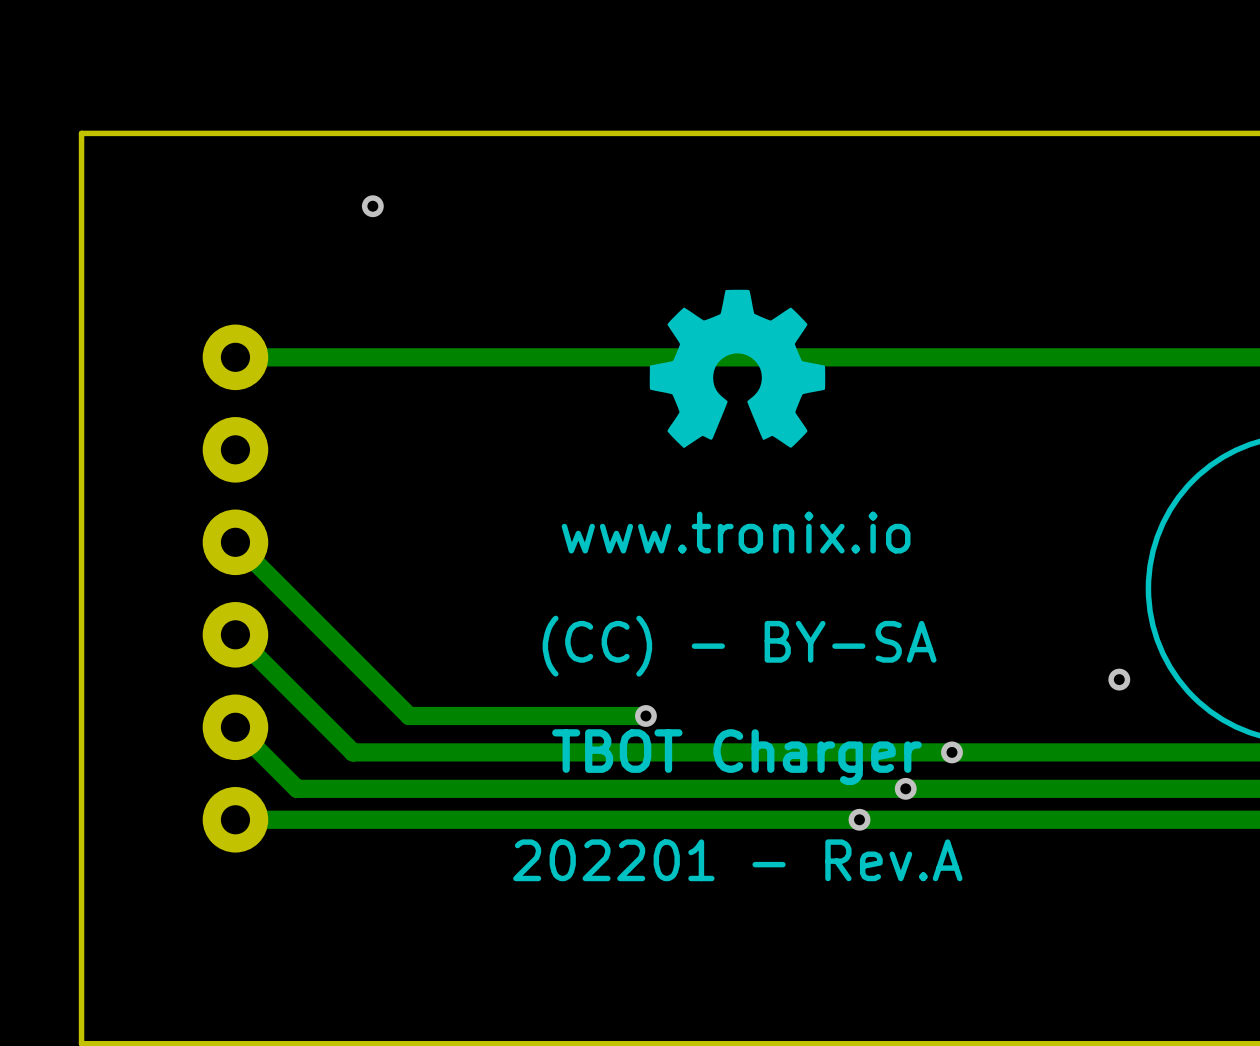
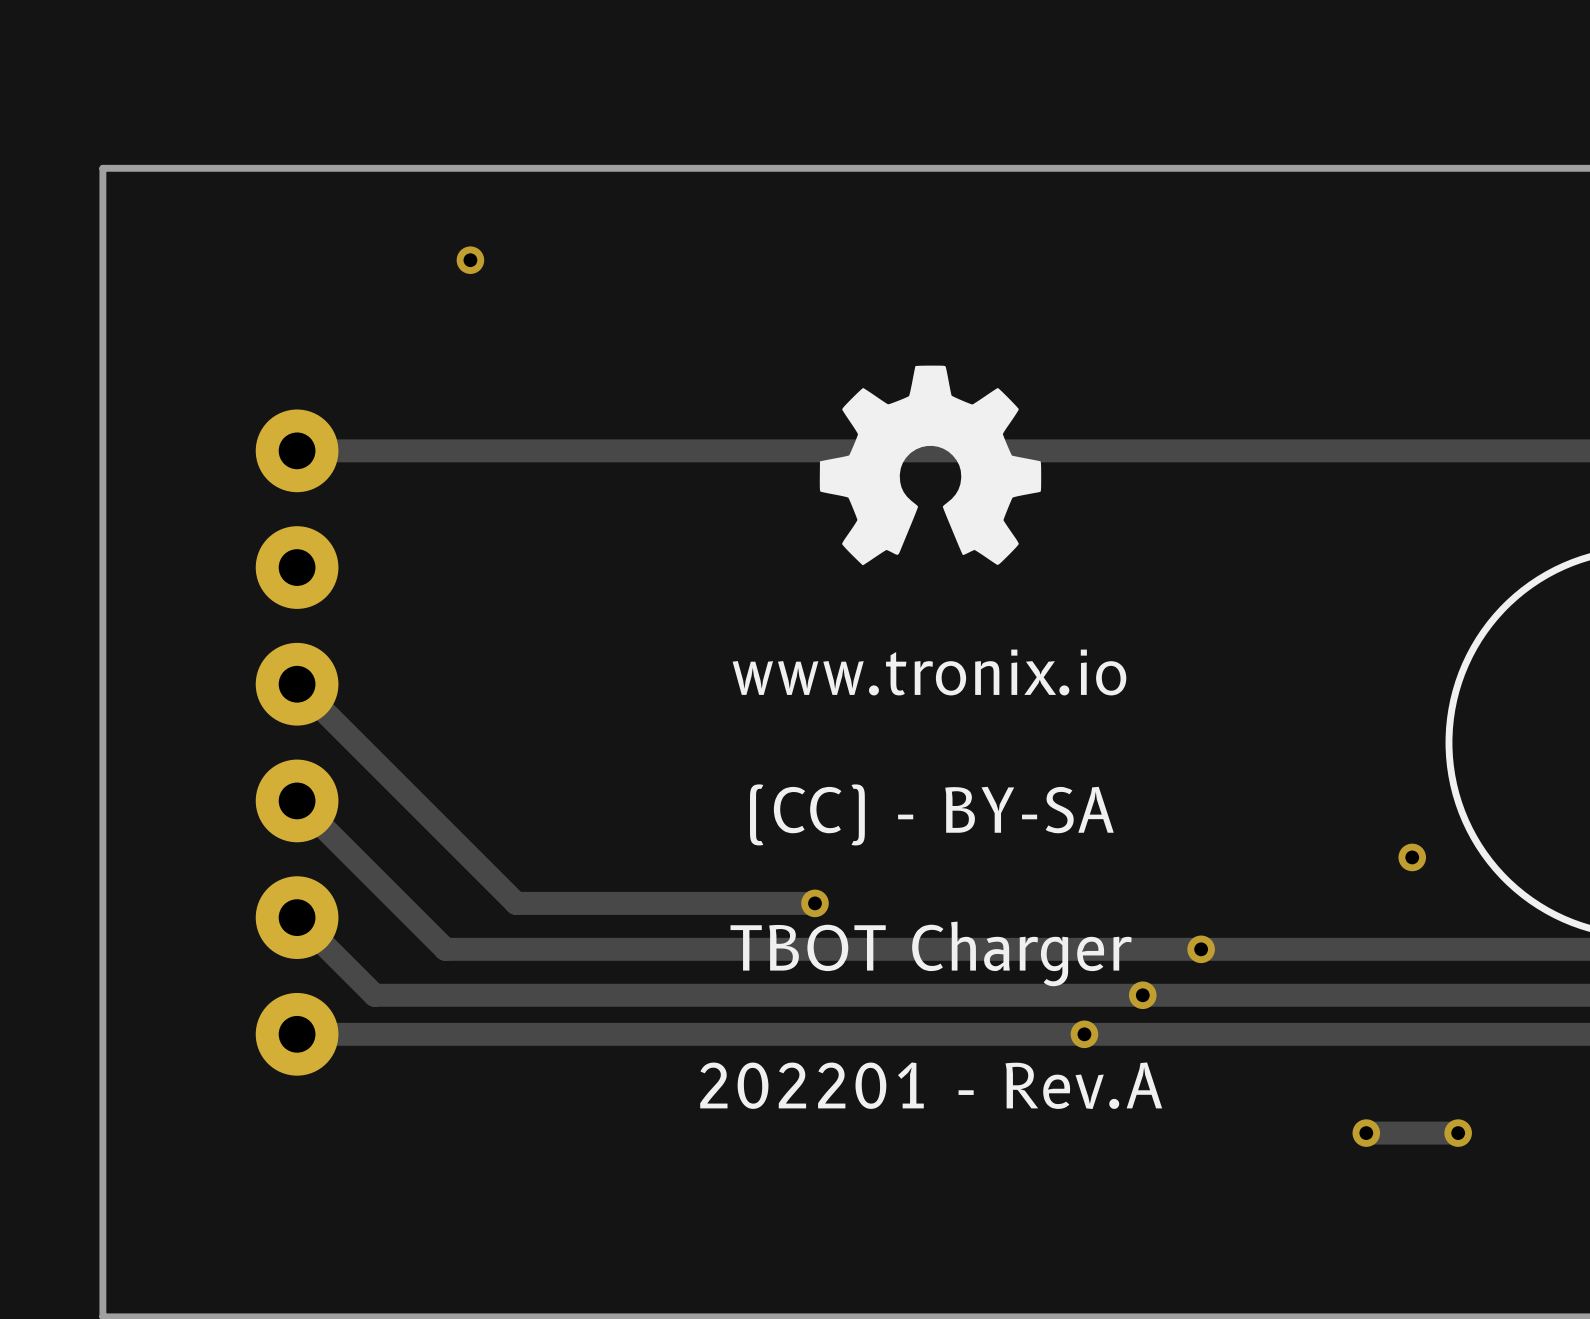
via: none -> (1366, 1133)
track: none -> (1458, 1133) (1366, 1133)
via: none -> (1458, 1133)

